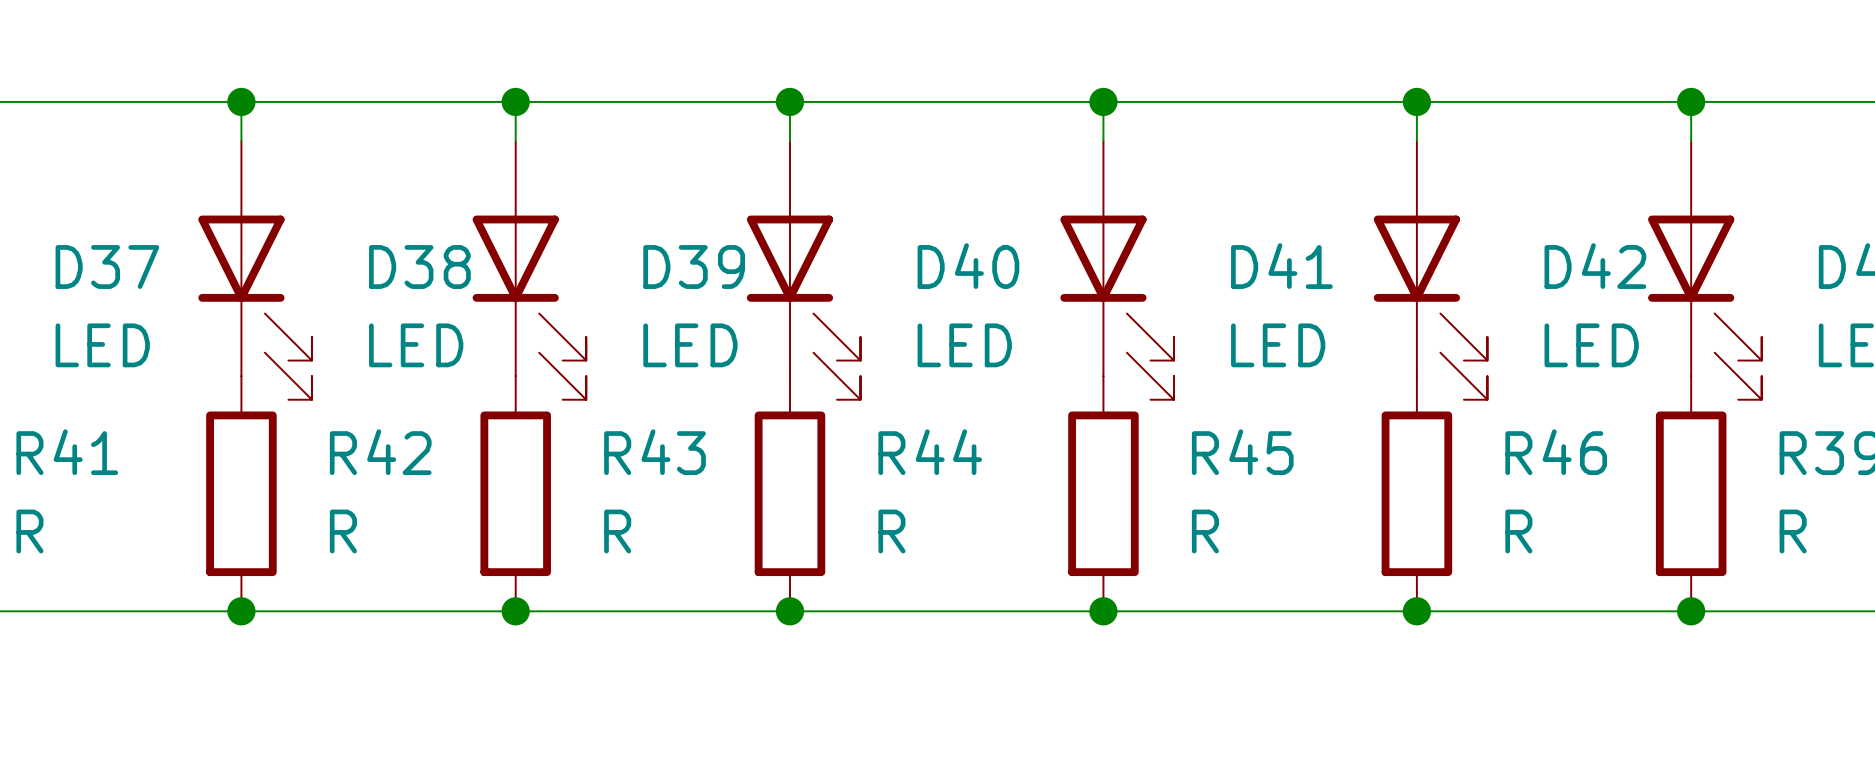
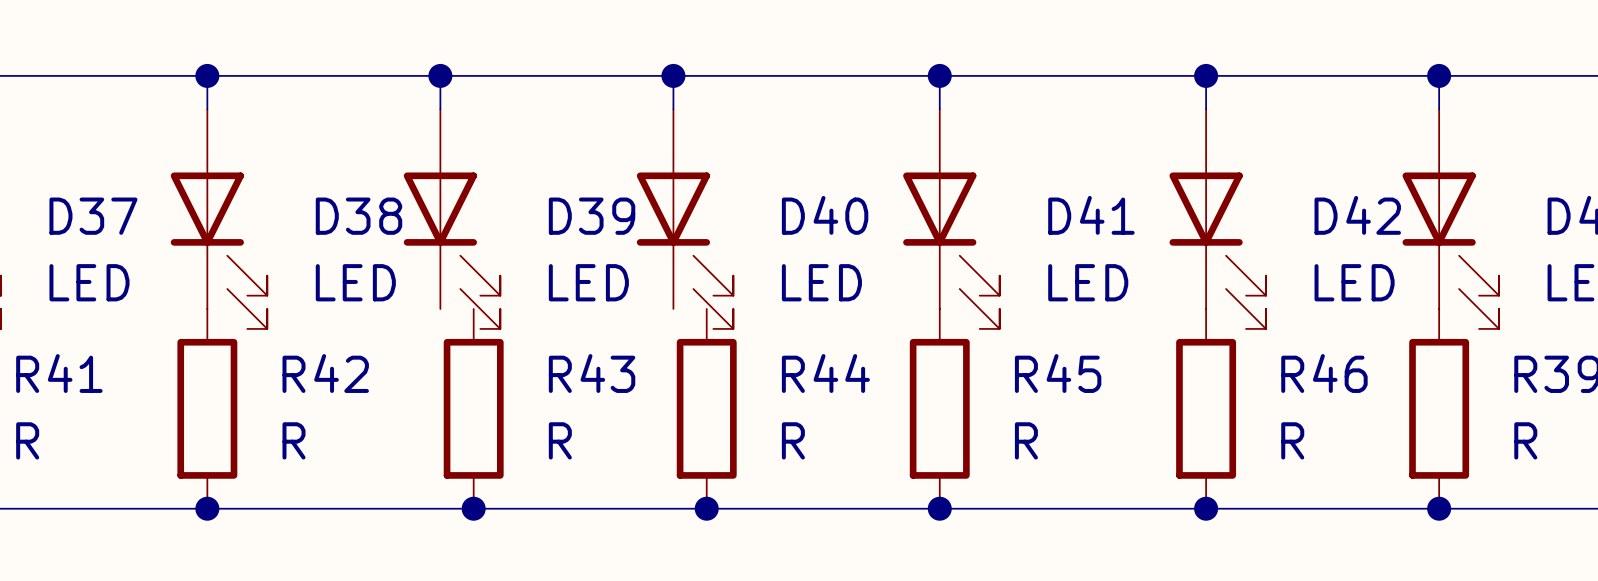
R43 position: (515, 493) -> (473, 408)
R44 position: (789, 493) -> (706, 408)
junction position: (515, 611) -> (473, 508)
junction position: (789, 611) -> (706, 508)

